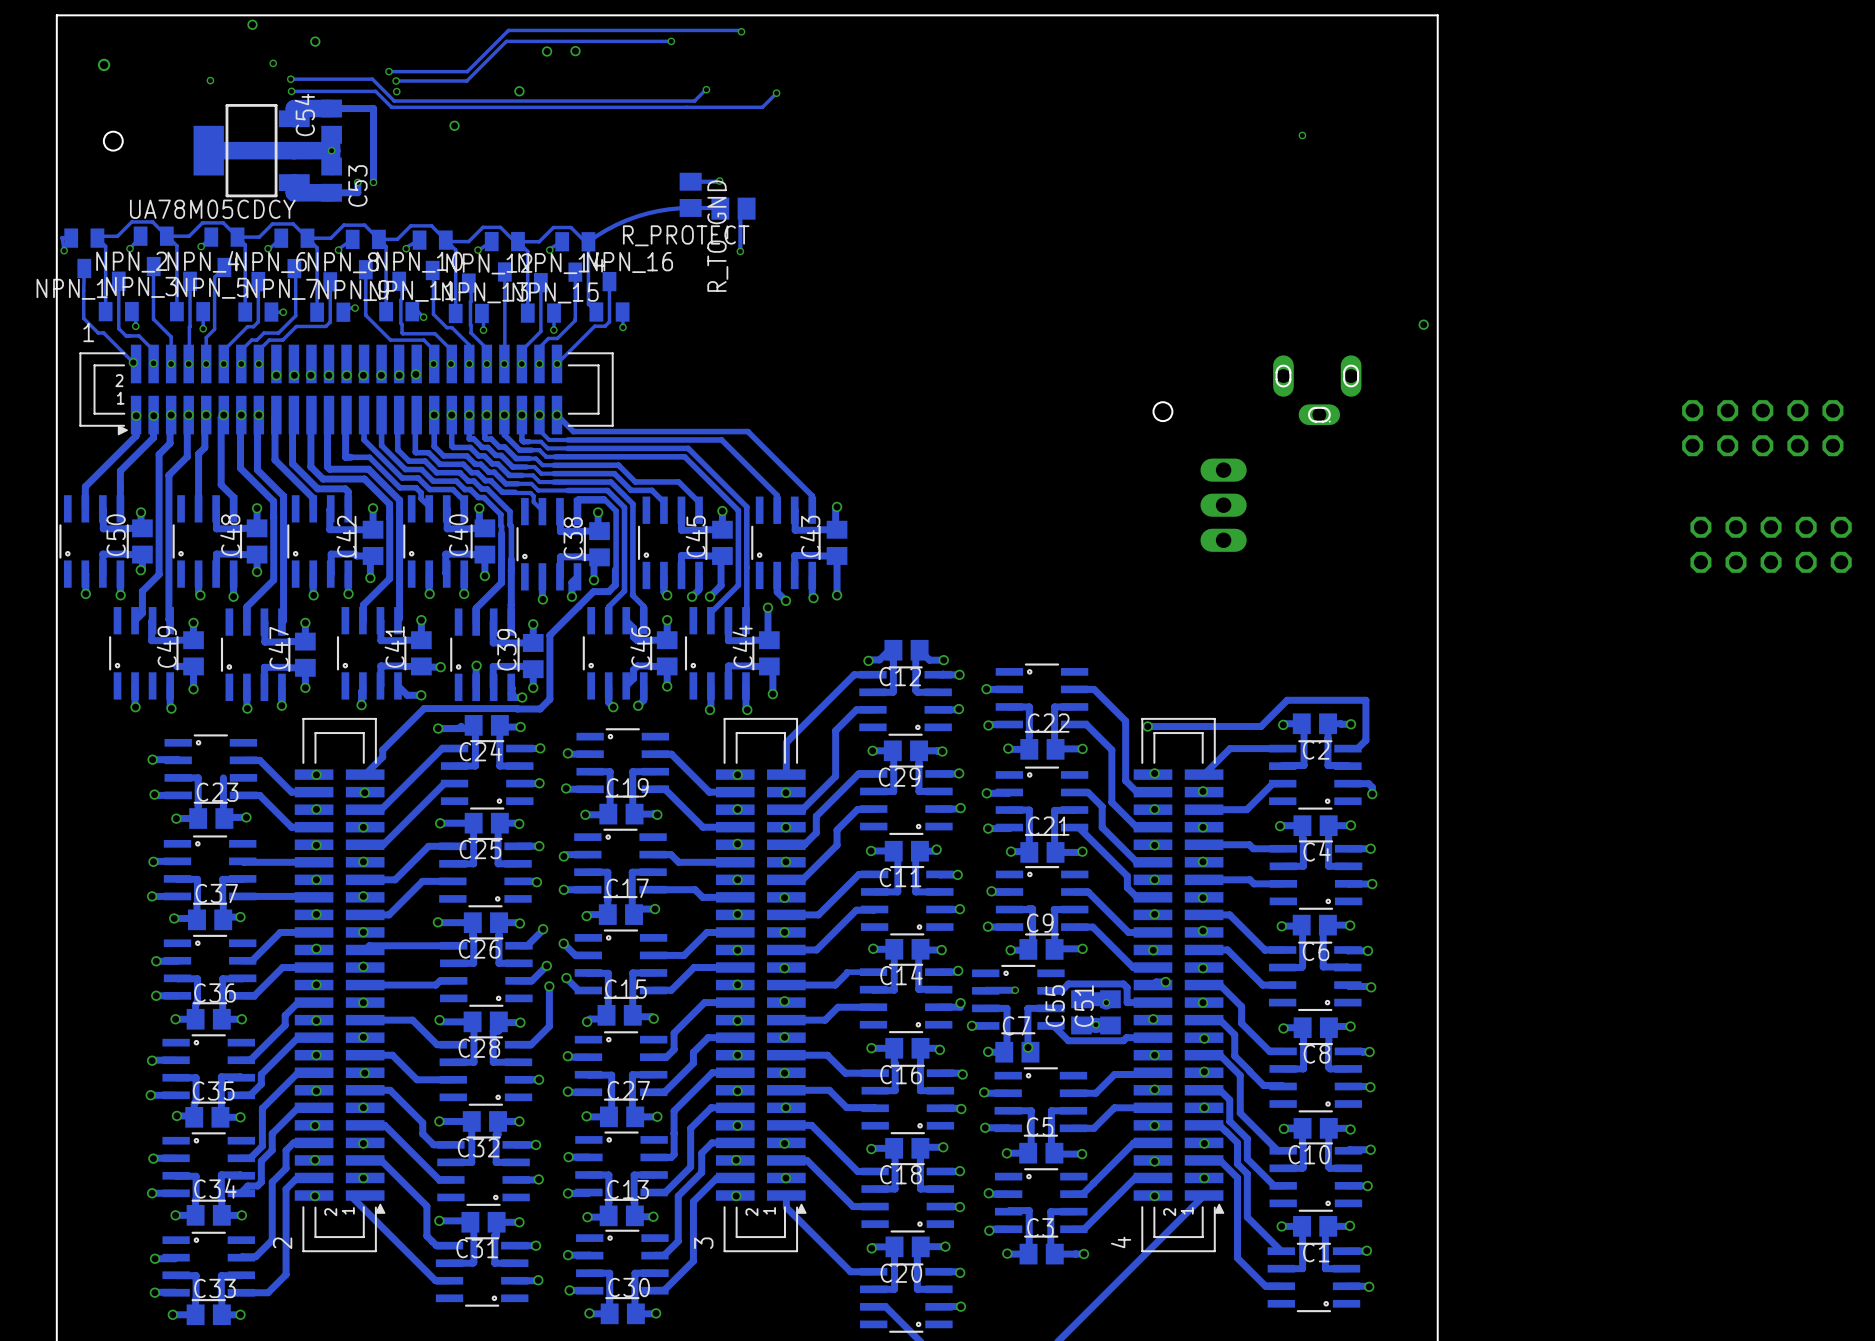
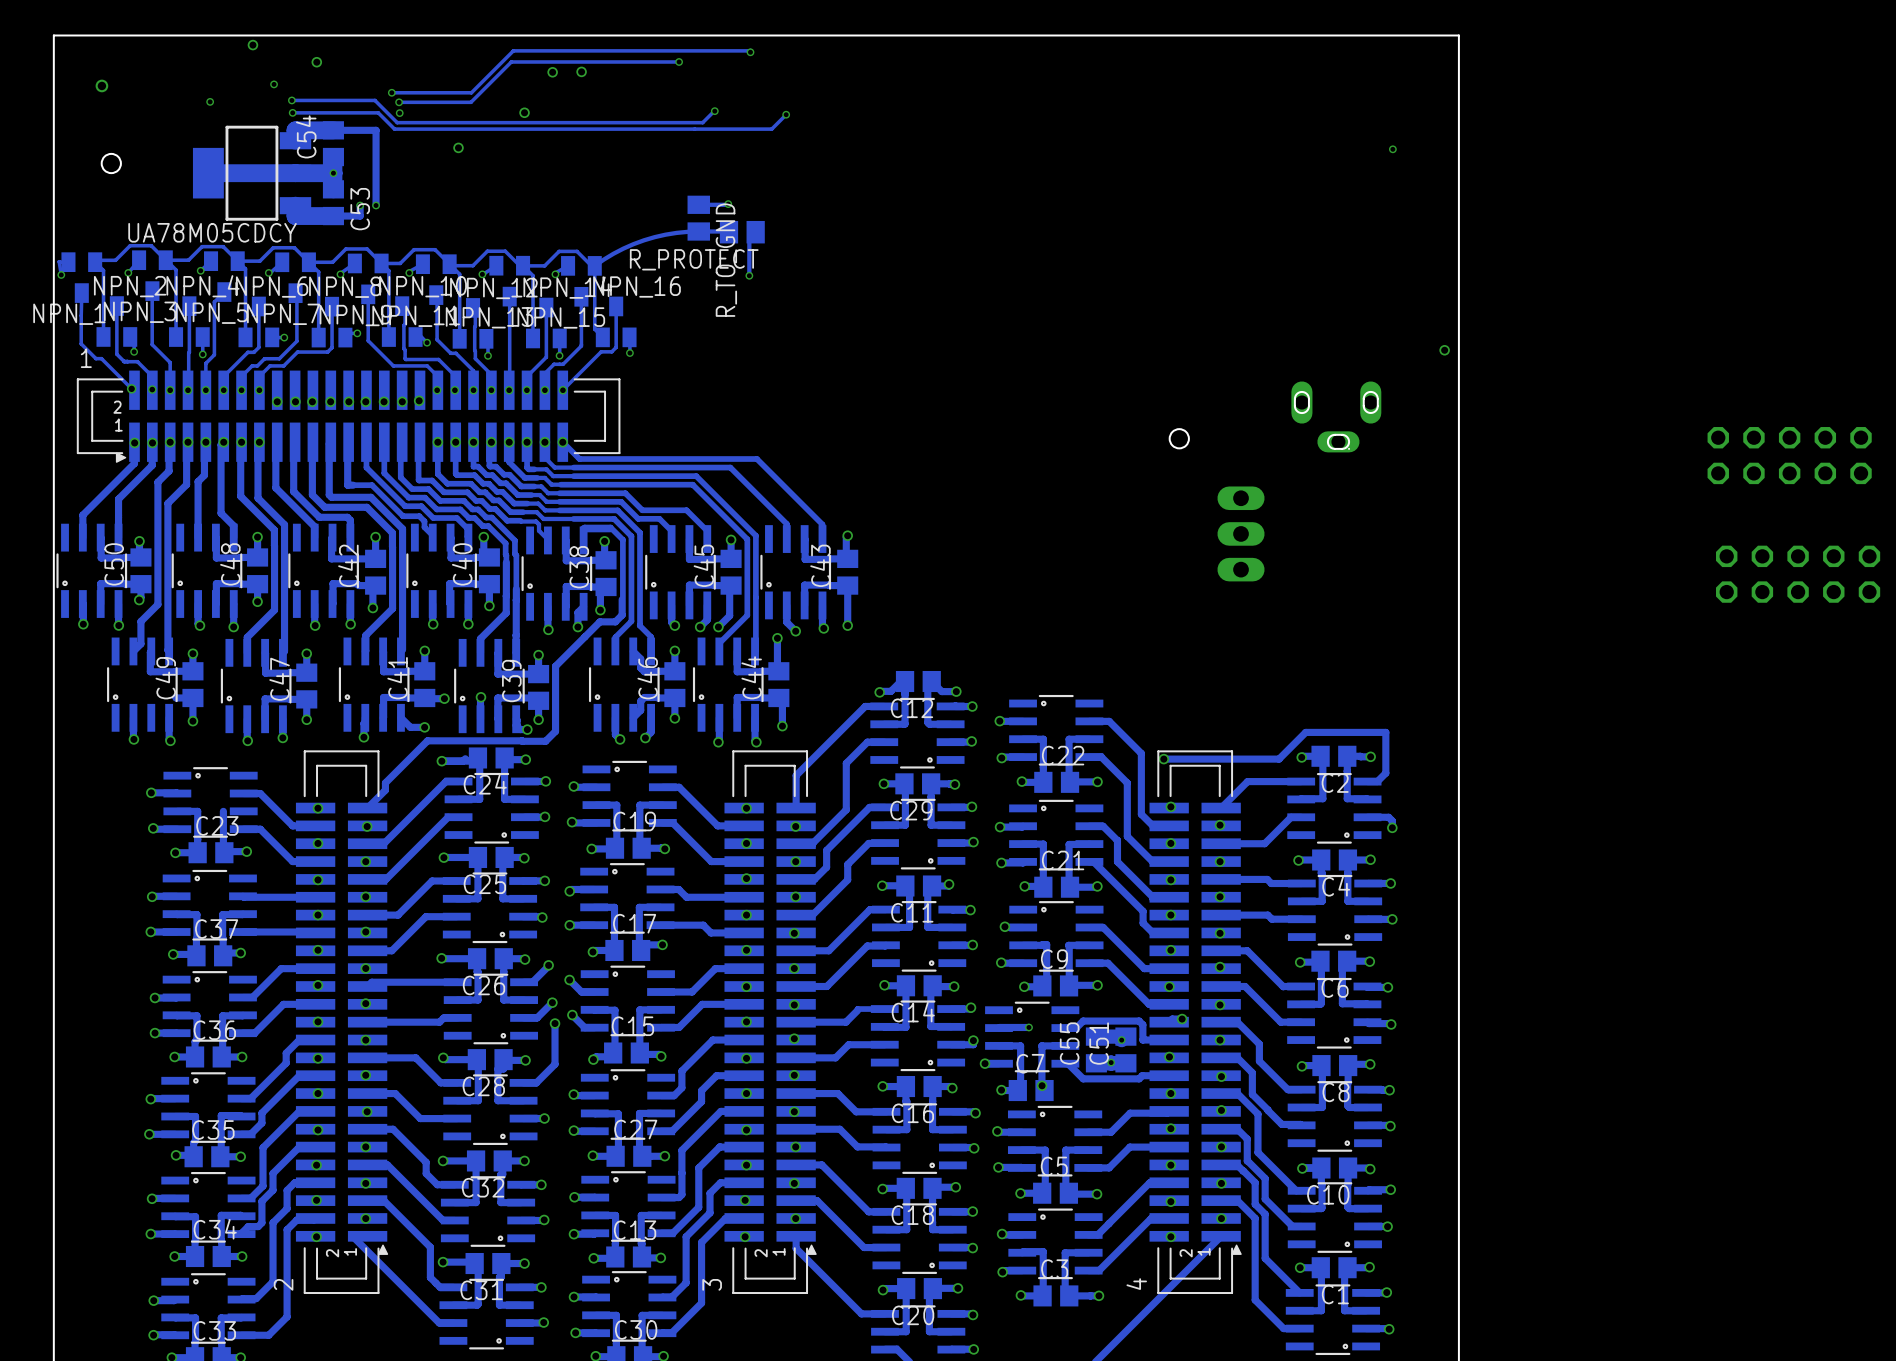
via position: (1302, 135) -> (1392, 149)

